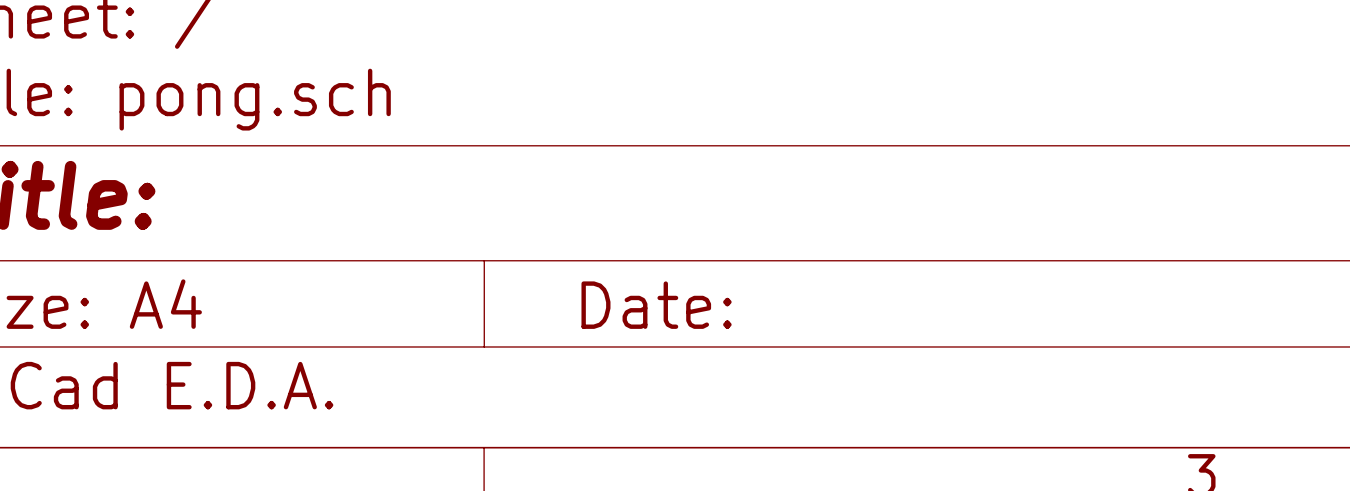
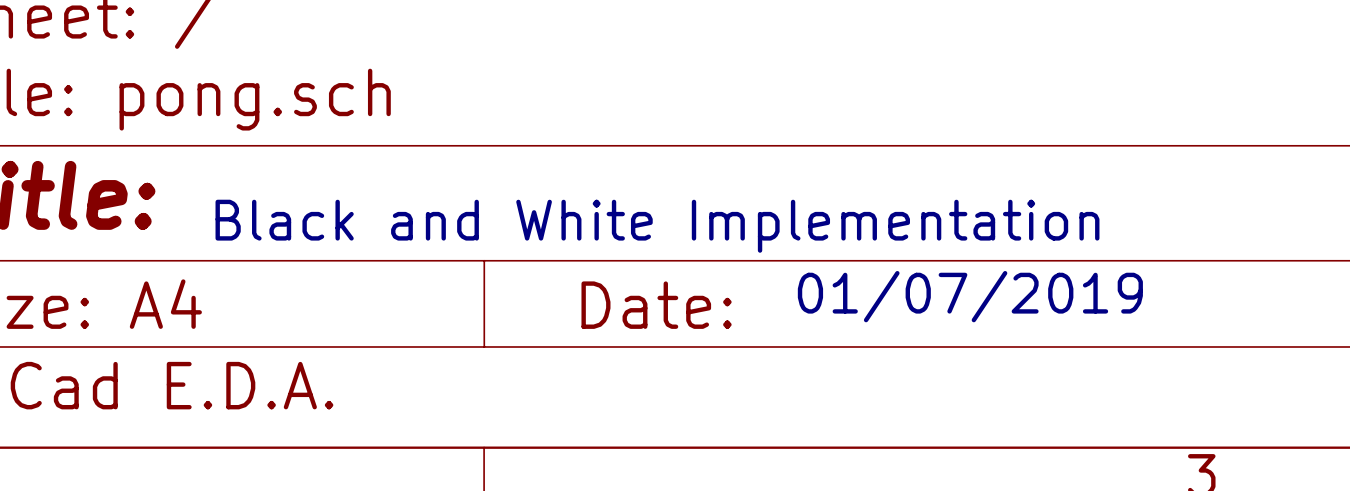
text: none -> Black and White Implementation (657, 226)
text: none -> 01/07/2019 (970, 296)

